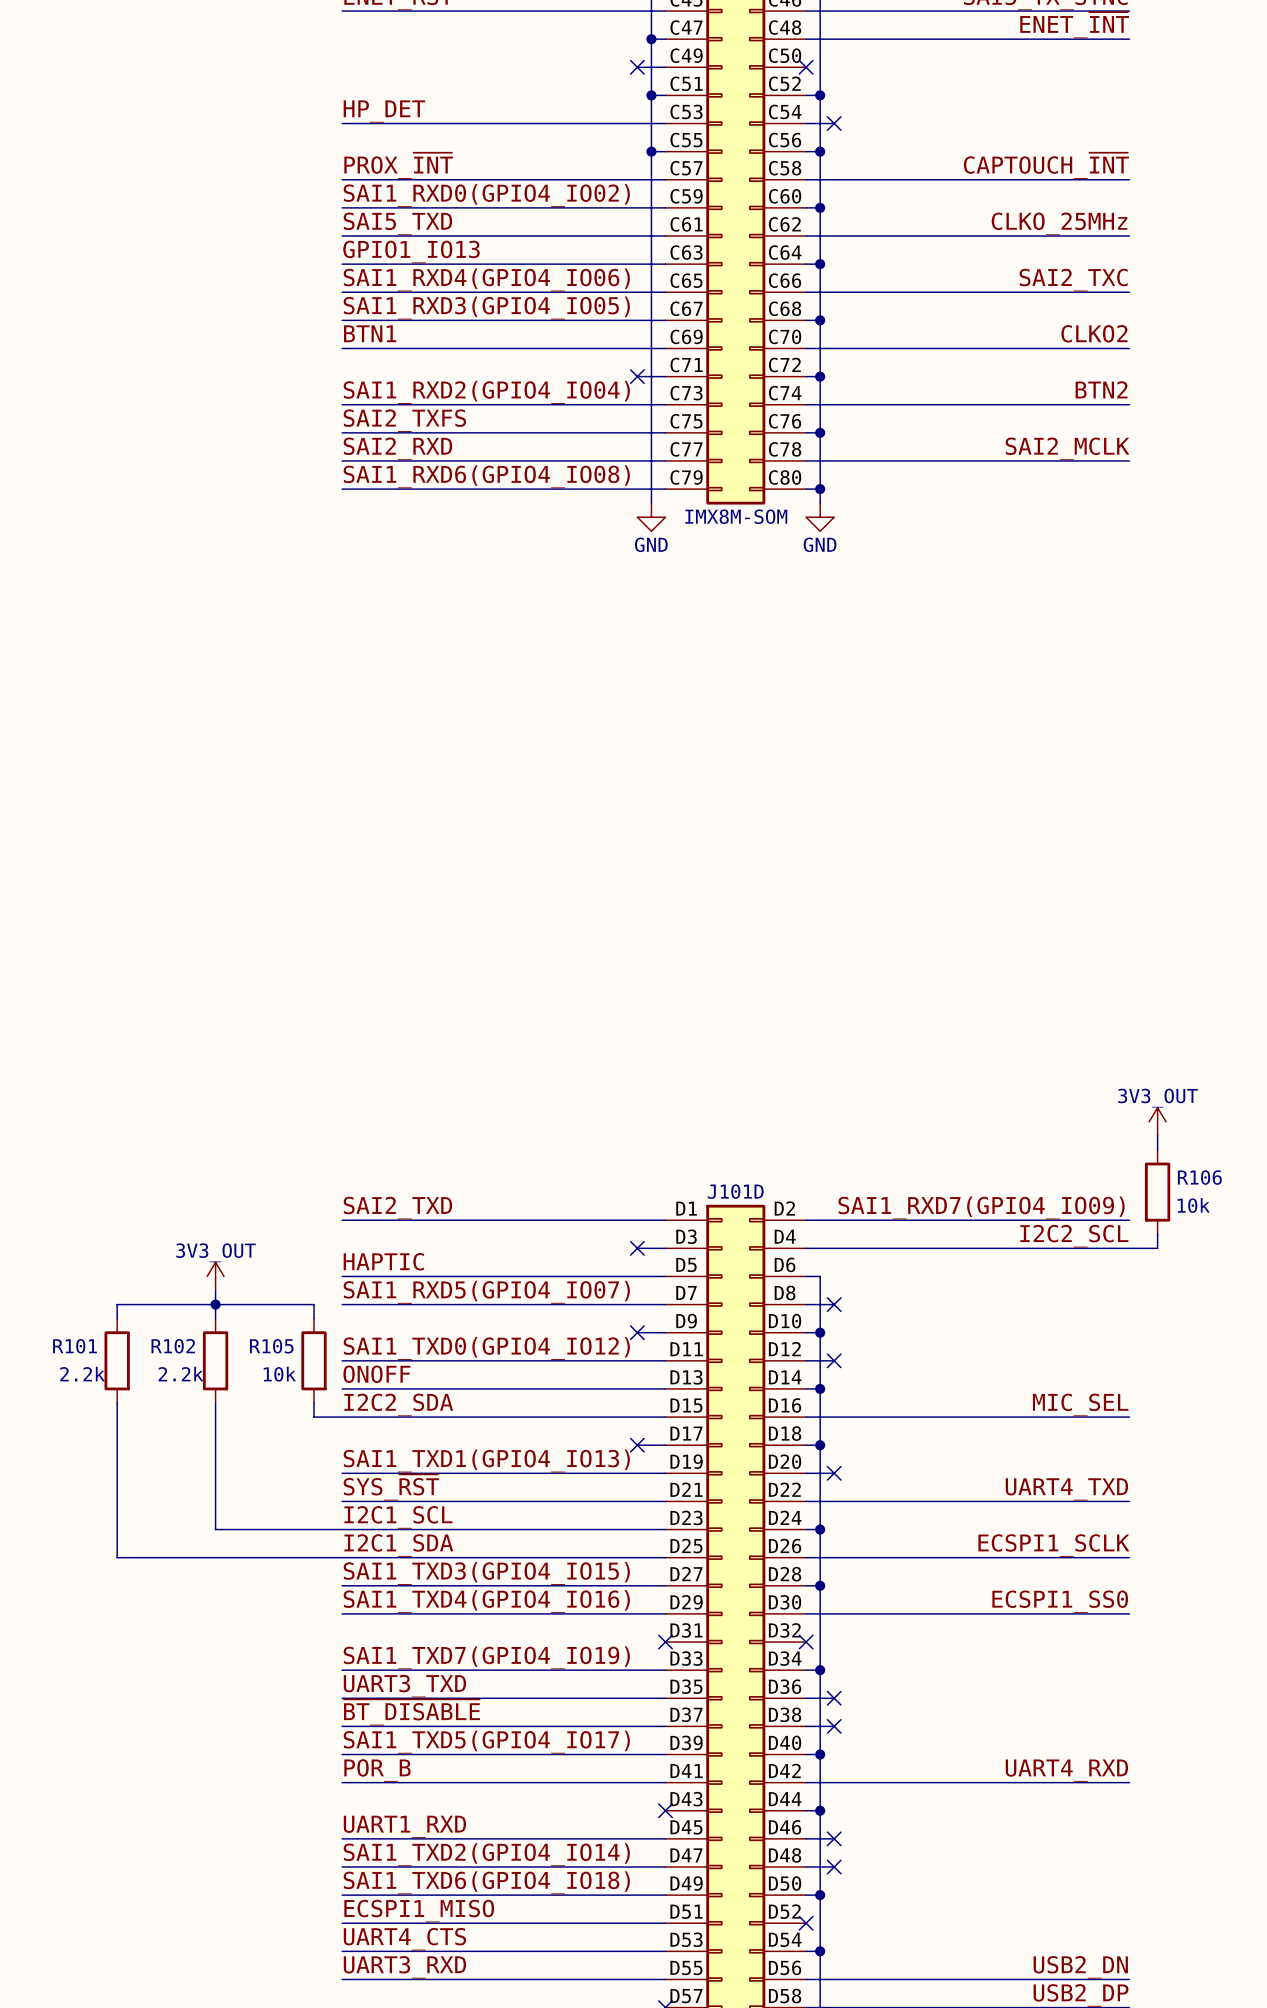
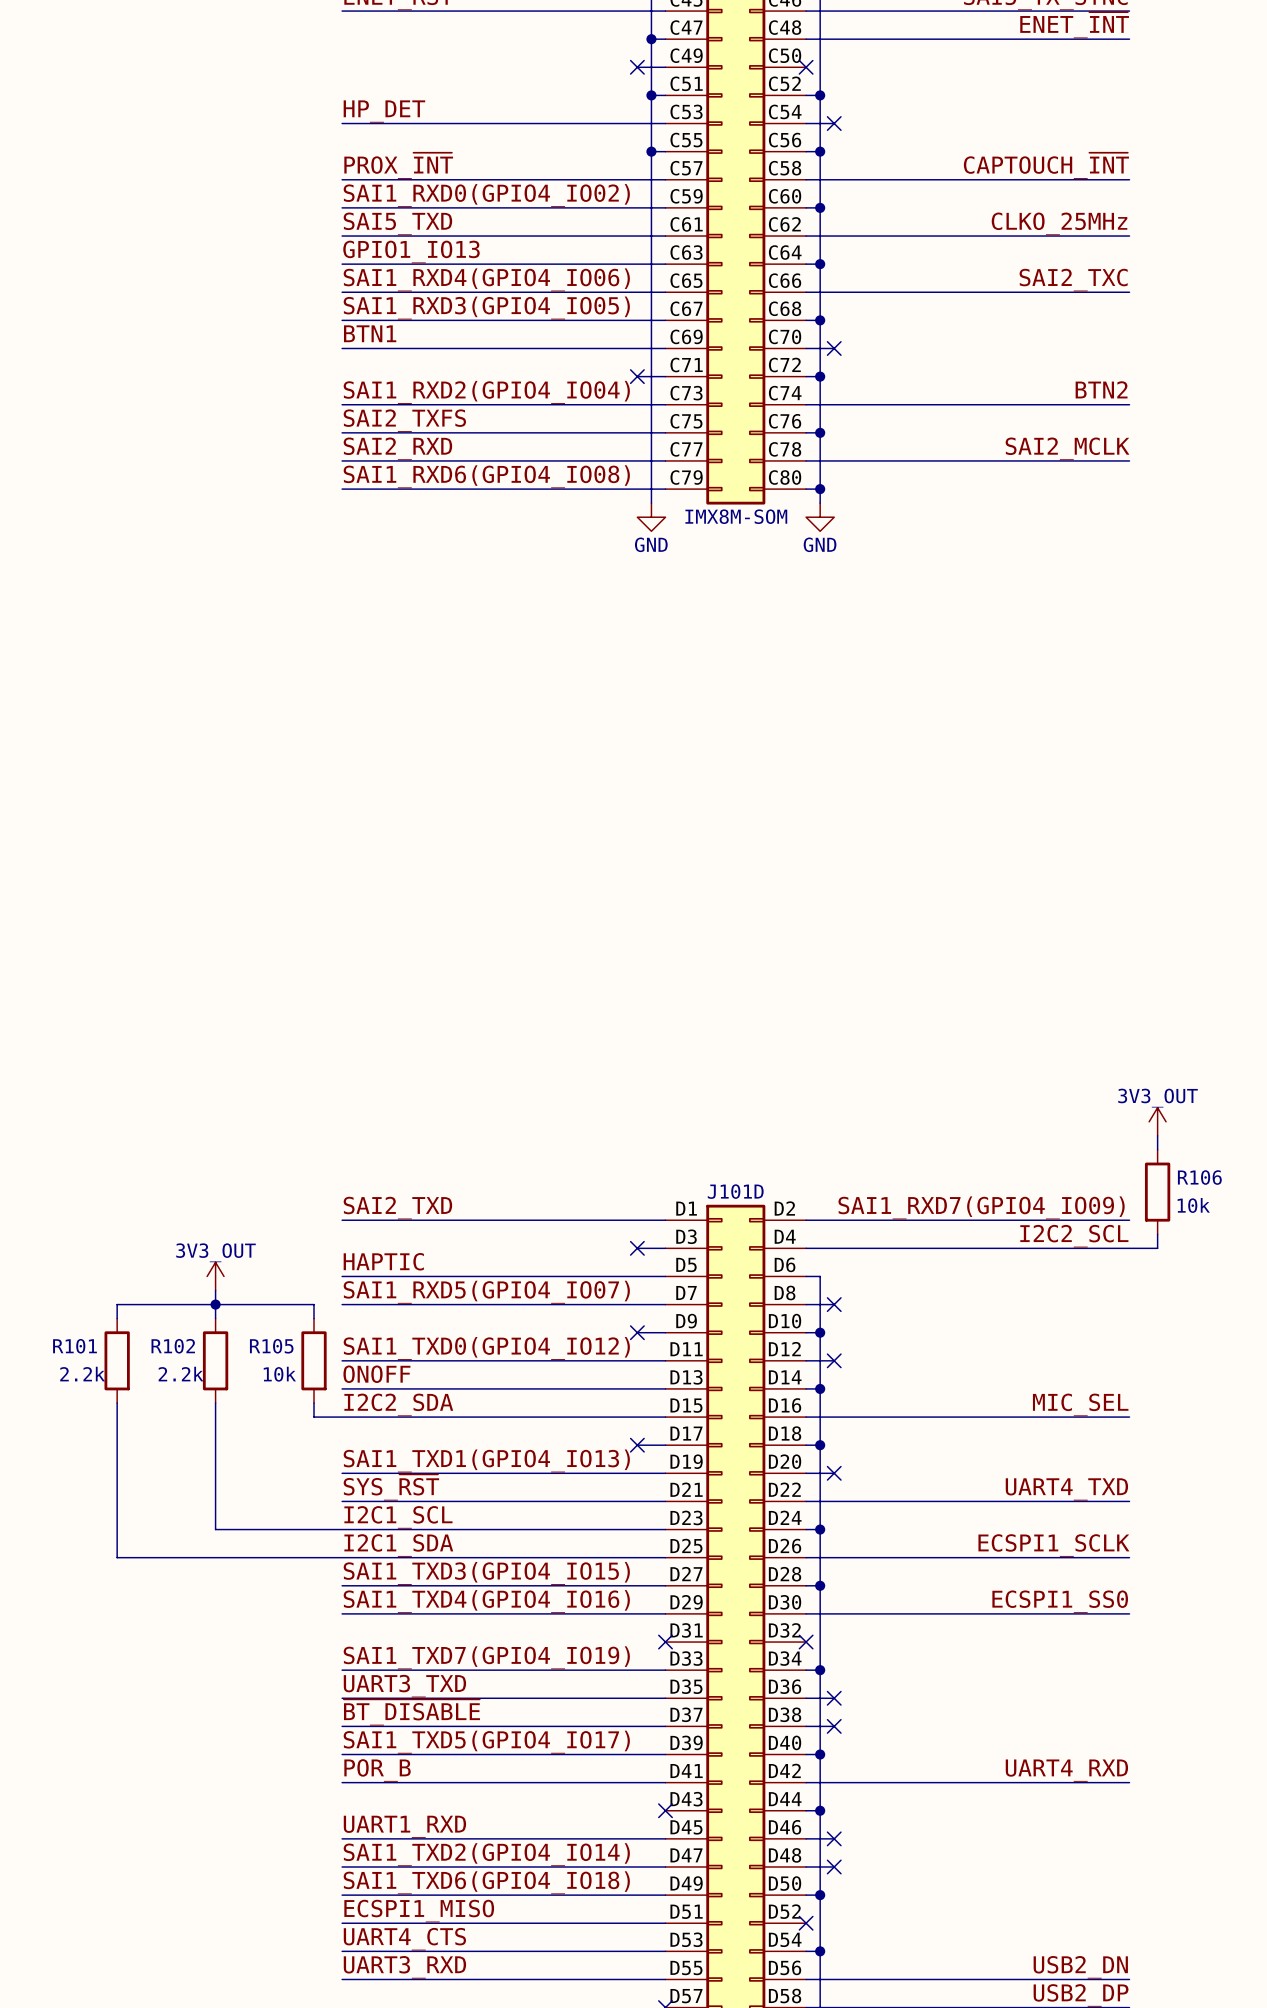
label: CLKO2 (1094, 333) -> none
wire: (834, 348) (1129, 348) -> none
no-connect mark: none -> (834, 348)

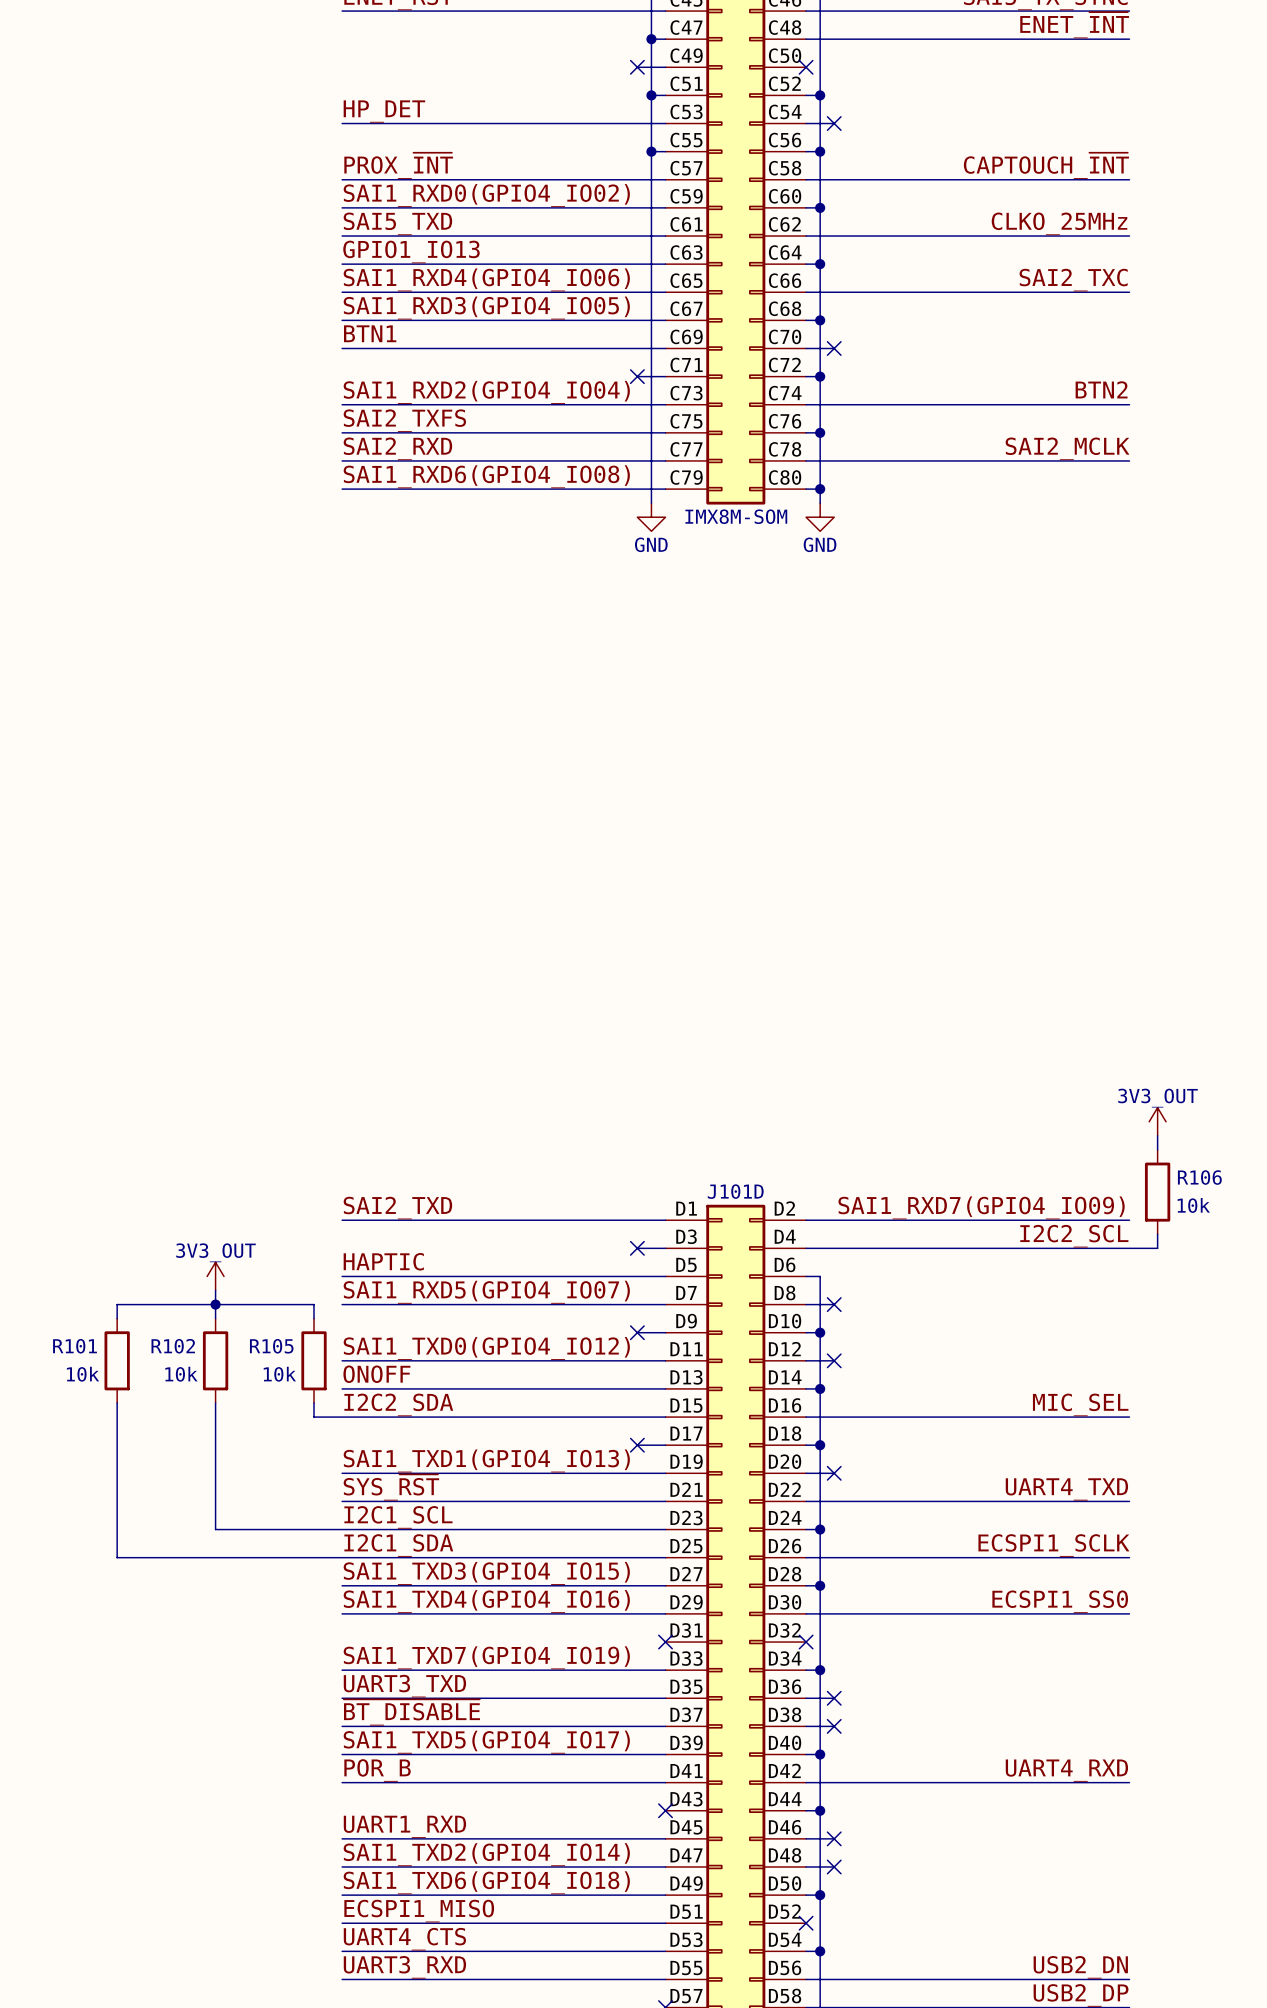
R101 value: 2.2k (82, 1374) -> 10k (83, 1374)
R102 value: 2.2k (180, 1374) -> 10k (181, 1374)

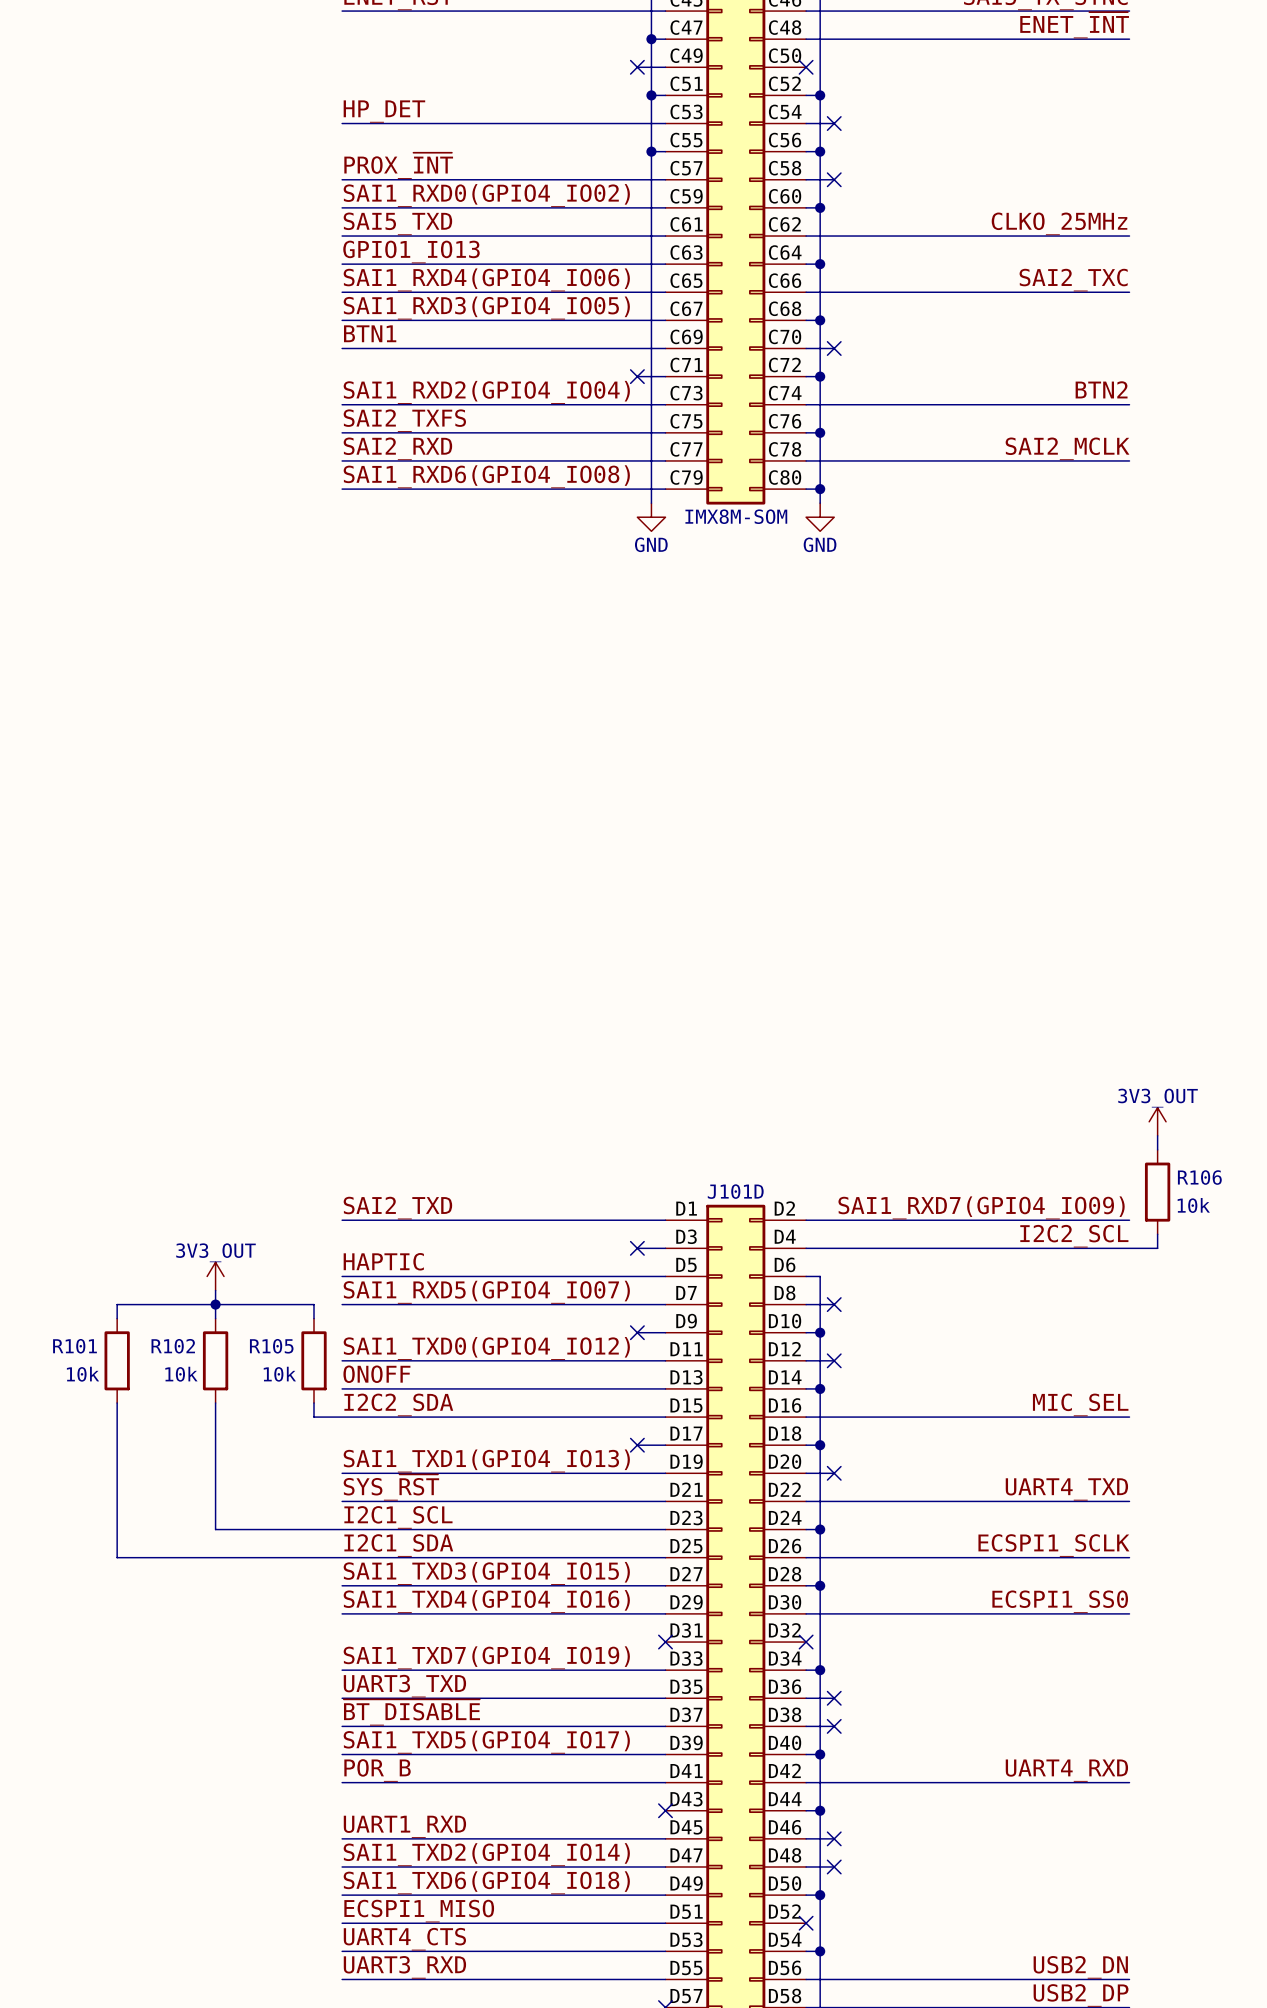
label: CAPTOUCH_~{INT} (1046, 165) -> none
wire: (834, 179) (1129, 179) -> none
no-connect mark: none -> (834, 179)

